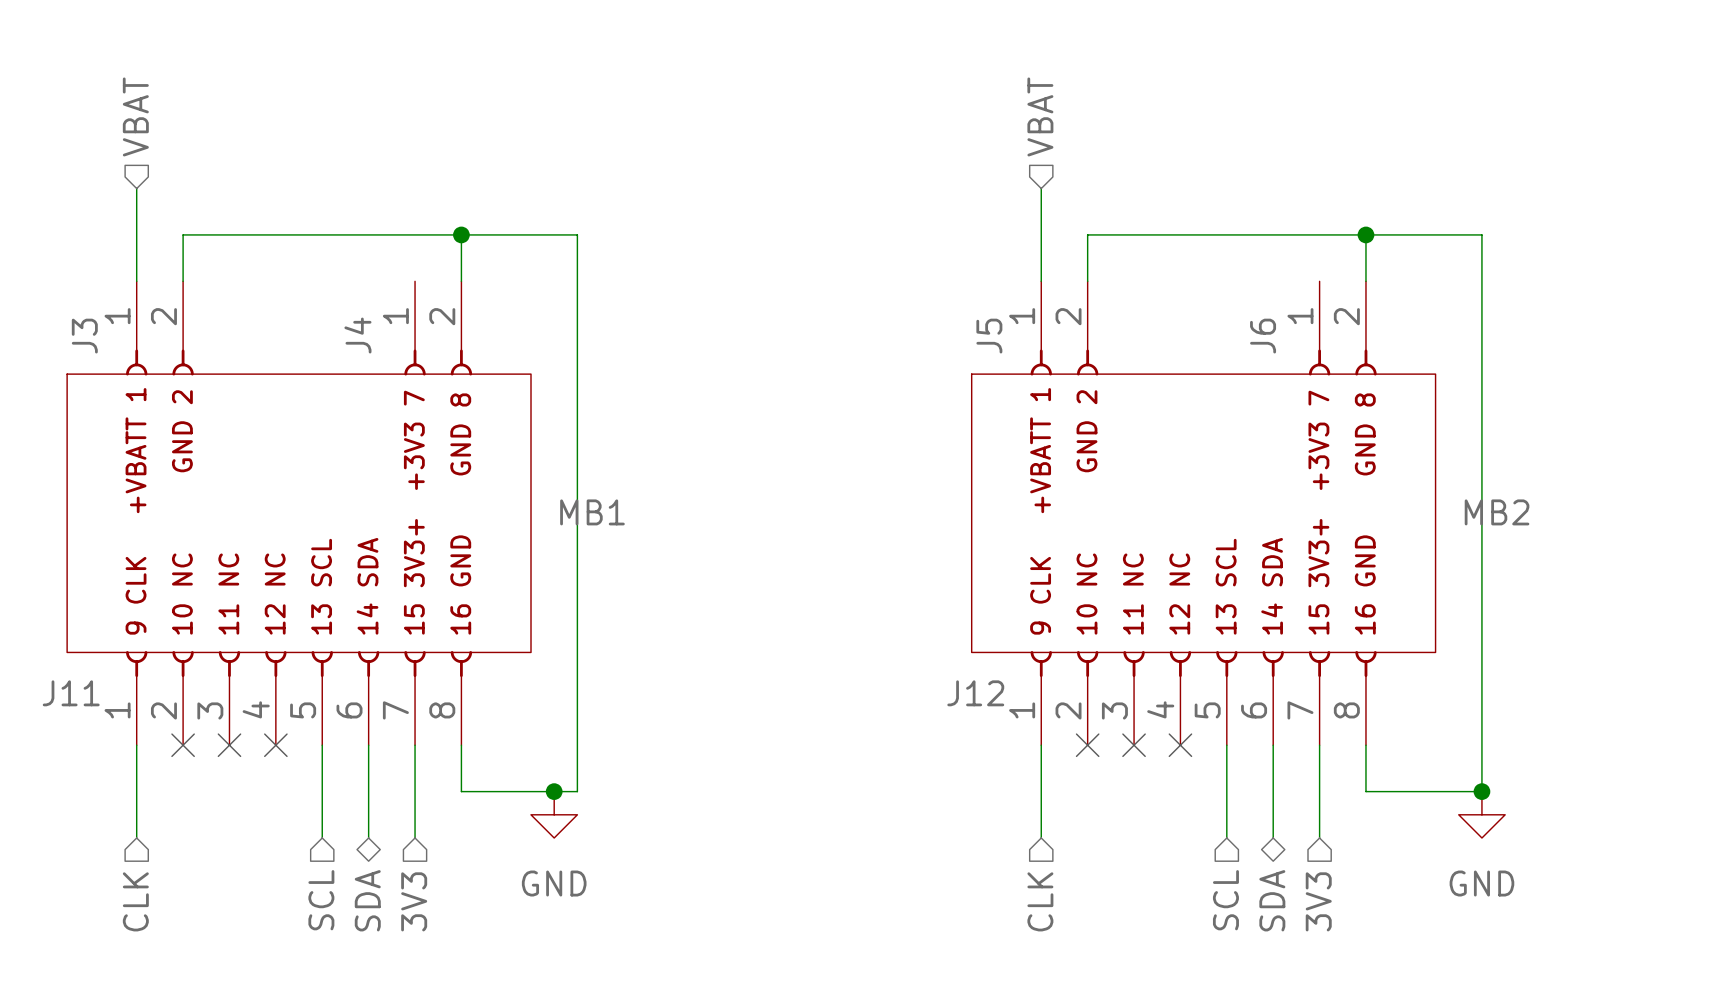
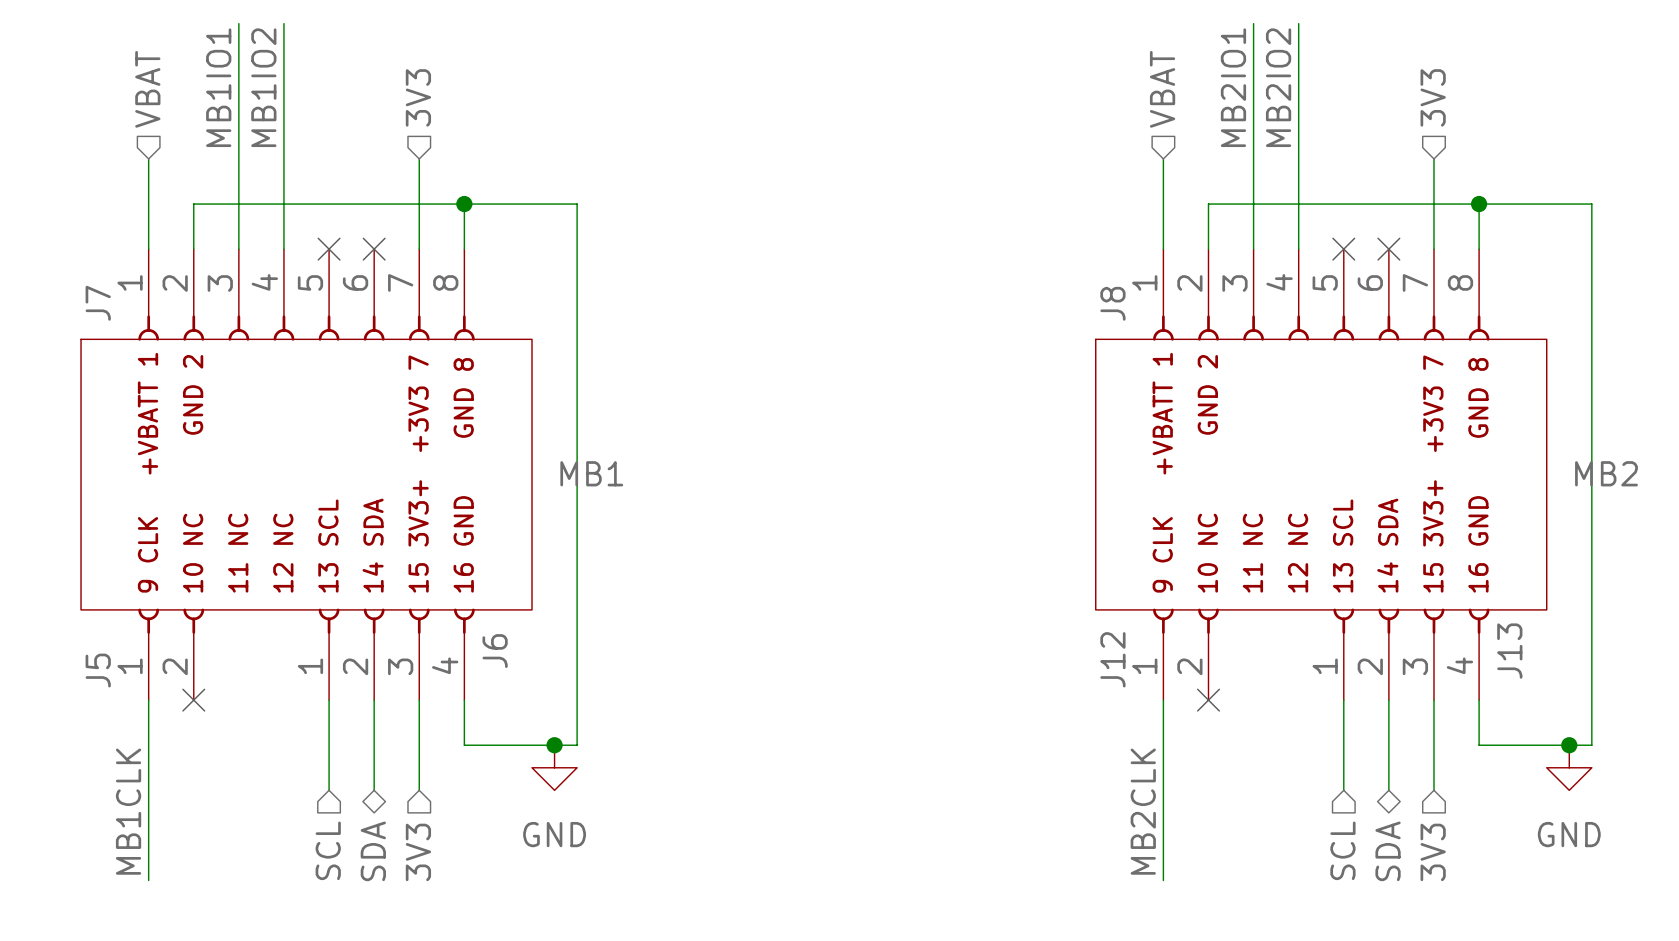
wire: none -> (238, 23) (238, 249)
wire: none -> (283, 23) (283, 249)
wire: none -> (1253, 23) (1253, 249)
wire: none -> (1298, 23) (1298, 249)
label: none -> MB1IO1 (218, 87)
label: none -> MB1IO2 (263, 87)
label: none -> MB2IO1 (1233, 87)
label: none -> MB2IO2 (1278, 87)
hierarchical label position: VBAT (1040, 116) -> VBAT (1162, 89)
hierarchical label: none -> 3V3 (418, 97)
hierarchical label: none -> 3V3 (1433, 97)
wire: none -> (419, 158) (419, 249)
wire: (1041, 188) (1041, 281) -> (1163, 158) (1163, 249)
wire: none -> (1433, 158) (1433, 249)
wire: (1226, 234) (1087, 234) (1087, 281) -> (1208, 204) (1208, 249)
wire: (1365, 234) (1365, 281) -> (1479, 204) (1479, 249)
junction: (1365, 234) -> none
wire: (1481, 234) (1481, 791) (1365, 791) -> (1456, 204) (1591, 204) (1591, 745) (1479, 745) (1479, 700)
junction: none -> (1479, 204)
no-connect mark: none -> (329, 249)
no-connect mark: none -> (374, 249)
J6 symbol: [1308, 281, 1377, 376] -> [318, 608, 475, 701]
no-connect mark: none -> (1343, 249)
no-connect mark: none -> (1388, 249)
J3: (159, 328) -> none
J7: none -> (306, 294)
J4: (438, 328) -> none
J5 position: (1064, 328) -> (171, 654)
J8: none -> (1321, 294)
J6 name position: J6 (1263, 336) -> J6 (495, 651)
J5 flip: as is (1064, 362) -> up-down (171, 621)
MB2 position: (1203, 513) -> (1321, 474)
J12 symbol: [1030, 651, 1377, 746] -> [1153, 608, 1219, 701]
J12 name position: J12 (975, 693) -> J12 (1112, 659)
J11: (299, 698) -> none
J13: none -> (1411, 654)
no-connect mark: (229, 745) -> none
no-connect mark: (275, 745) -> none
wire: (1041, 745) (1041, 837) -> none
no-connect mark: (1087, 745) -> none
no-connect mark: (1134, 745) -> none
wire: none -> (1163, 700) (1163, 880)
no-connect mark: (1180, 745) -> none
wire: (1226, 745) (1226, 837) -> none
no-connect mark: none -> (1208, 700)
wire: (1273, 745) (1273, 837) -> (1388, 700) (1388, 790)
wire: (1319, 745) (1319, 837) -> (1433, 700) (1433, 790)
wire: none -> (1343, 745) (1343, 790)
junction: (1481, 791) -> none
junction: none -> (1569, 745)
power symbol position: GND (1481, 814) -> GND (1569, 767)
wire: none -> (148, 790) (148, 880)
label: none -> MB1CLK (128, 811)
label: none -> MB2CLK (1143, 811)
hierarchical label position: SCL (1225, 900) -> SCL (1342, 850)
hierarchical label position: SDA (1272, 900) -> SDA (1388, 851)
hierarchical label: CLK (135, 901) -> none
hierarchical label: CLK (1040, 901) -> none
hierarchical label position: 3V3 (1318, 901) -> 3V3 (1433, 852)

